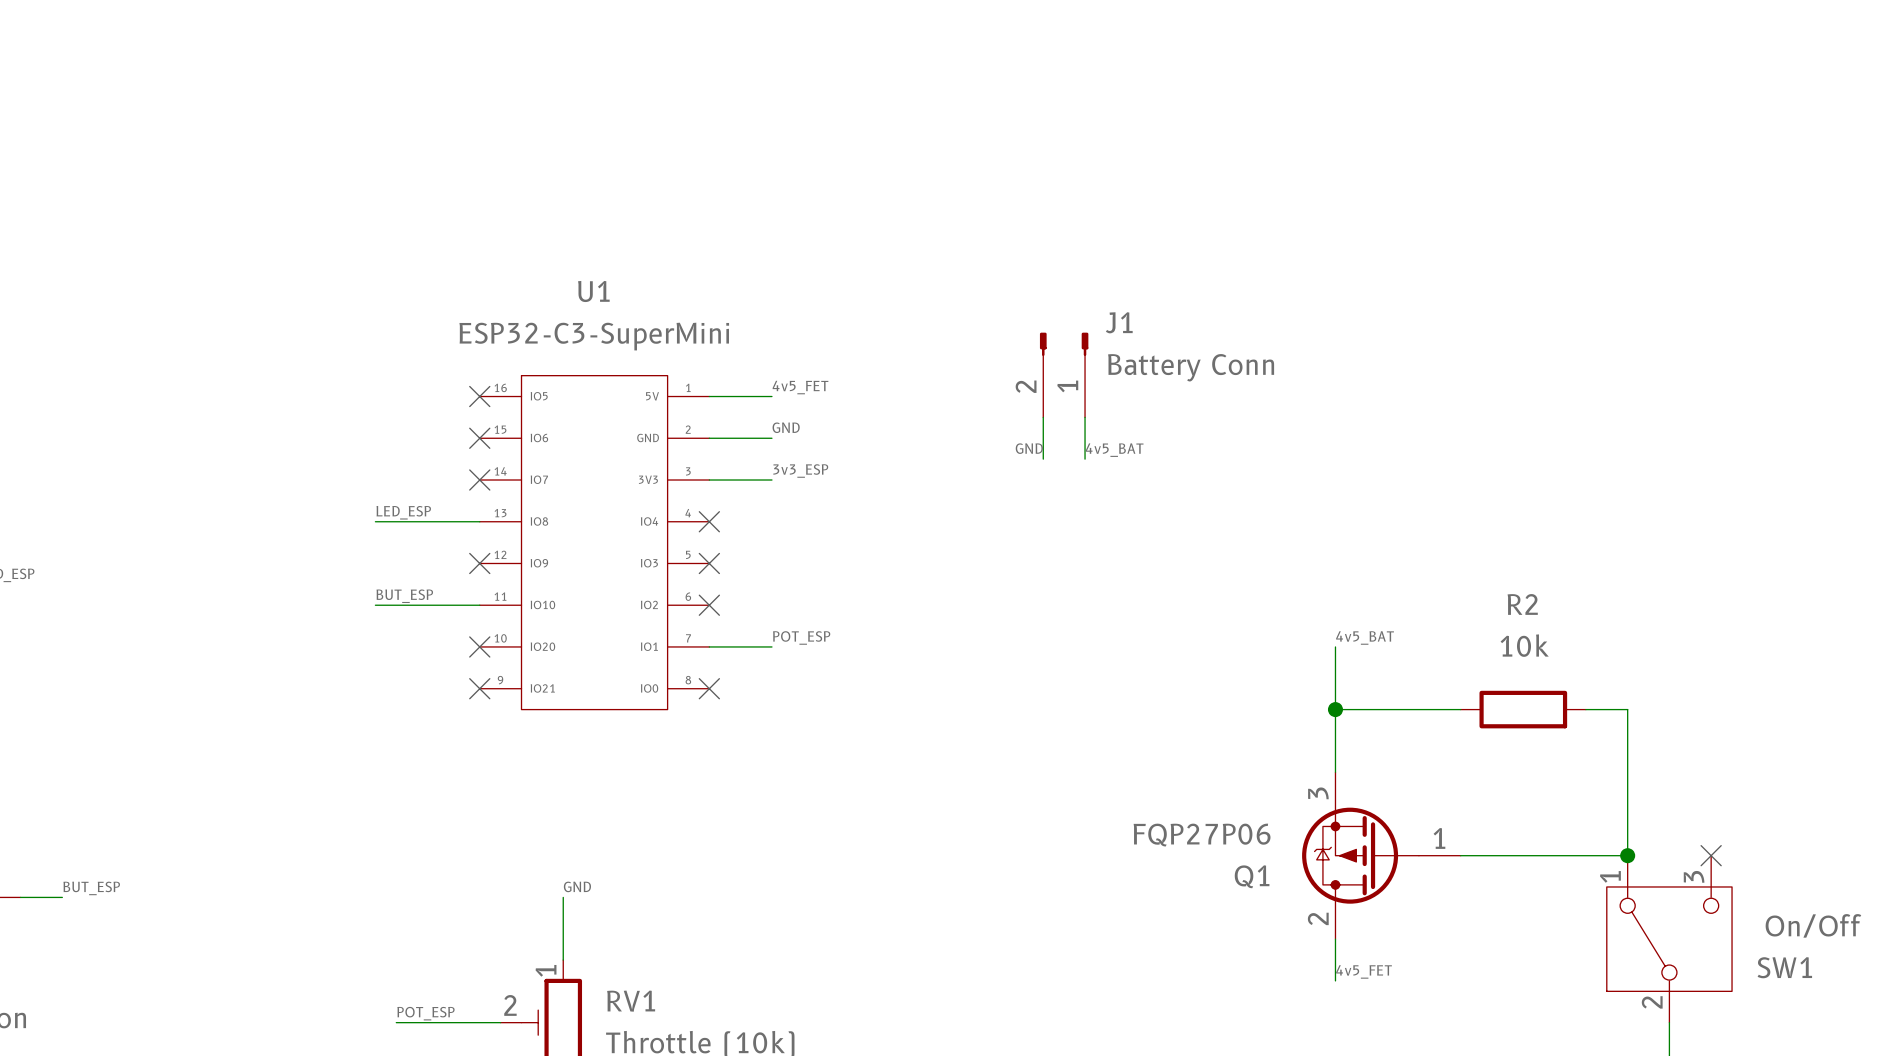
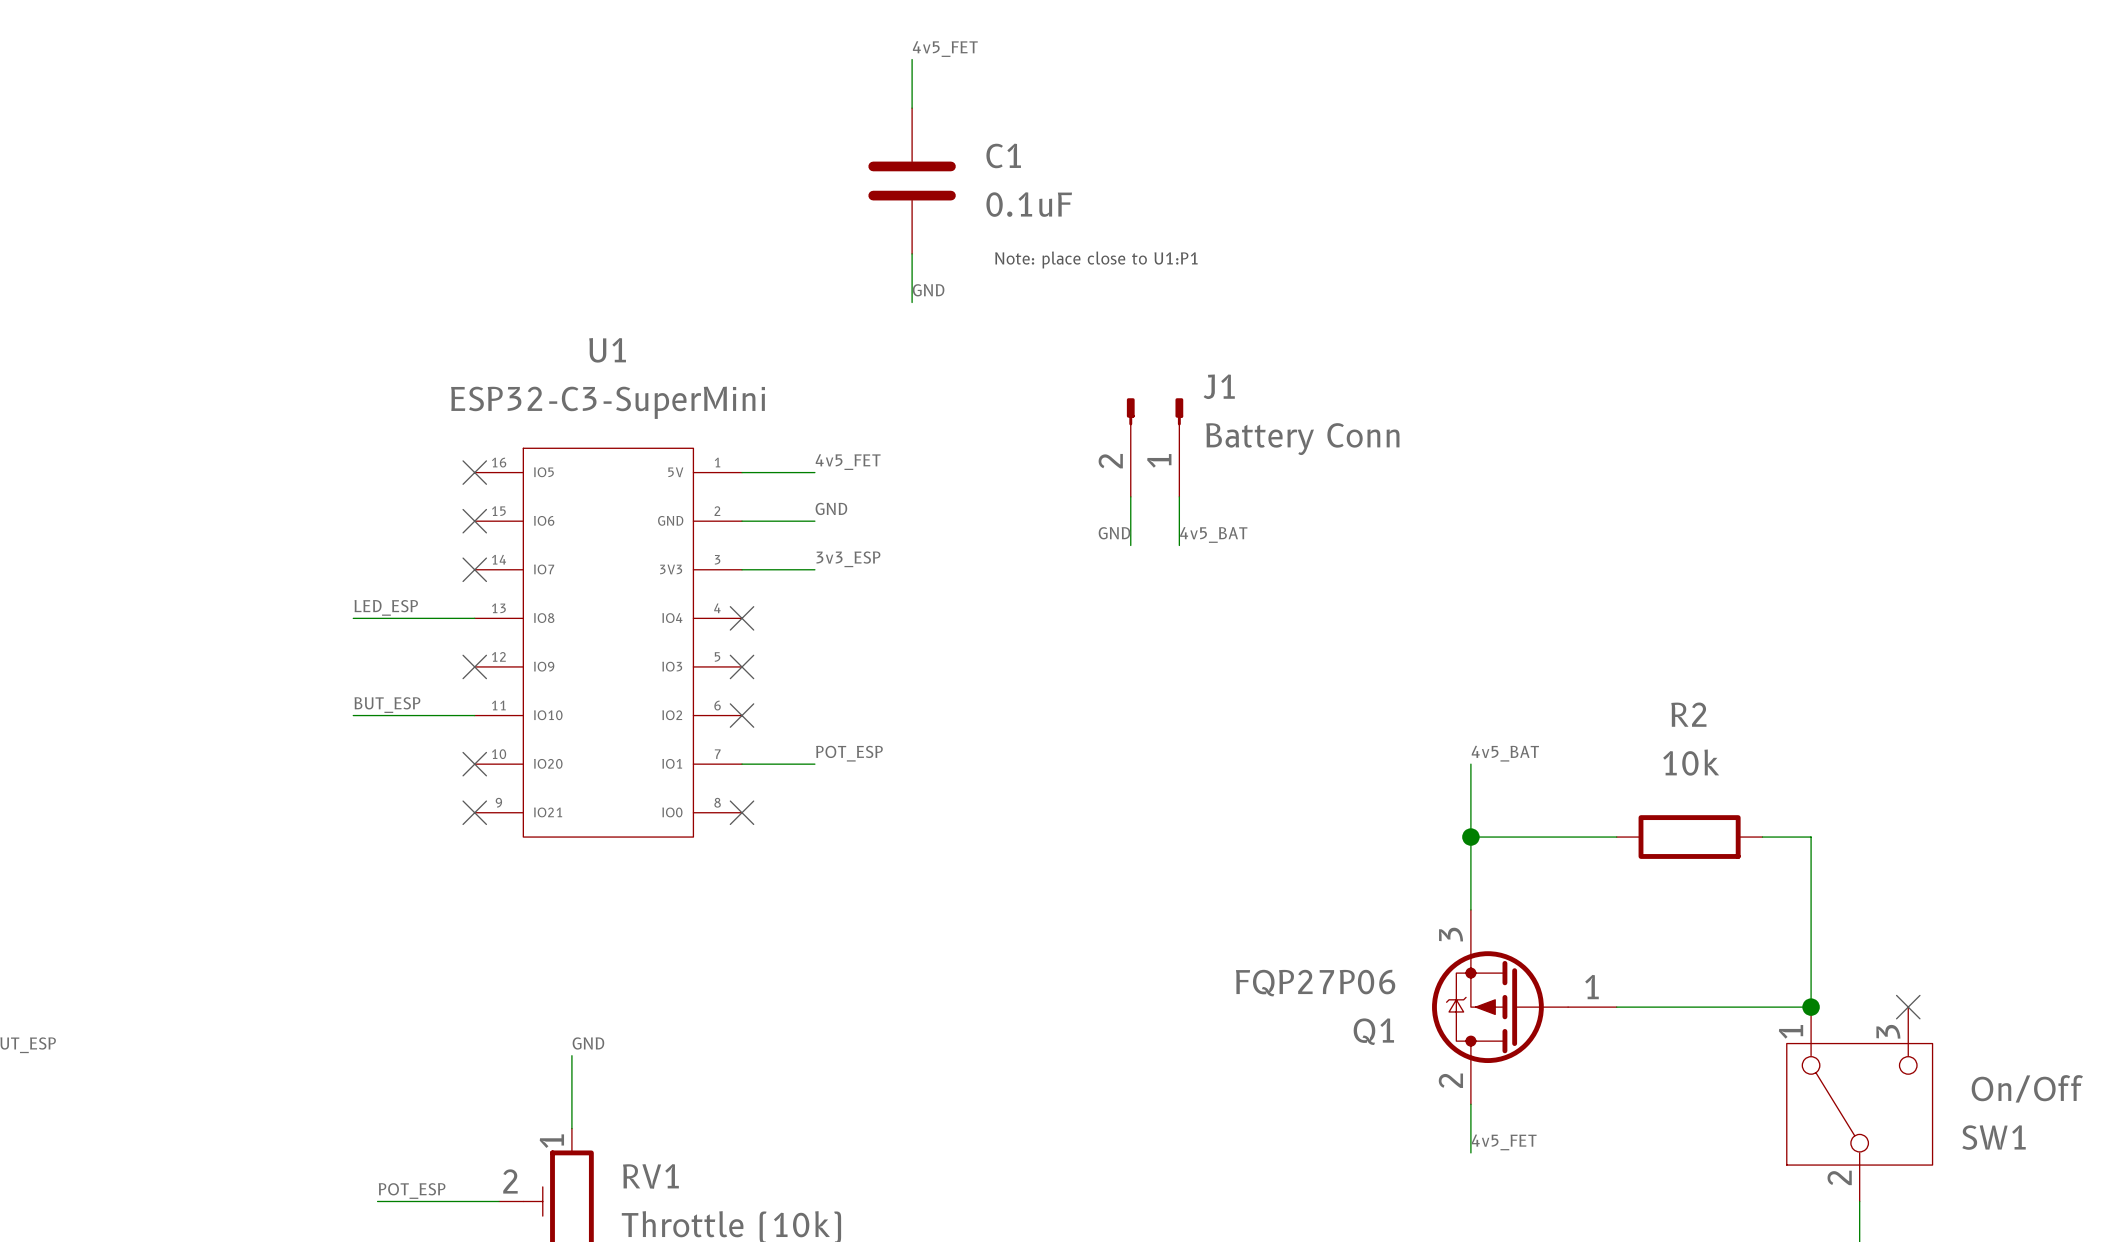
label: none -> 4v5_FET (945, 49)
wire: none -> (912, 59) (912, 108)
C1: none -> 0.1uF (912, 181)
wire: none -> (912, 253) (912, 302)
text: none -> Note: place close to U1:P1 (1096, 259)
label: none -> GND (928, 290)

